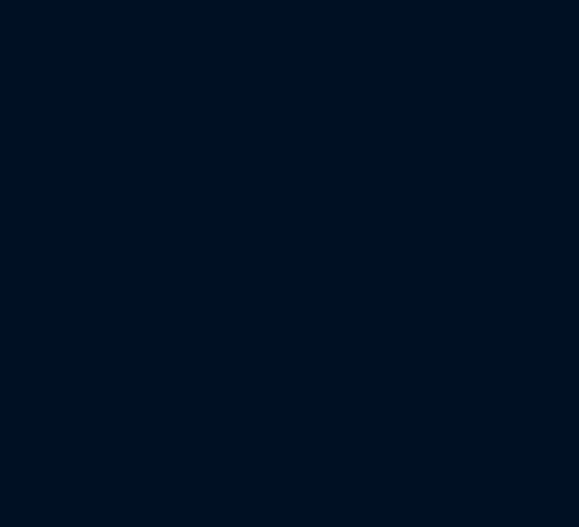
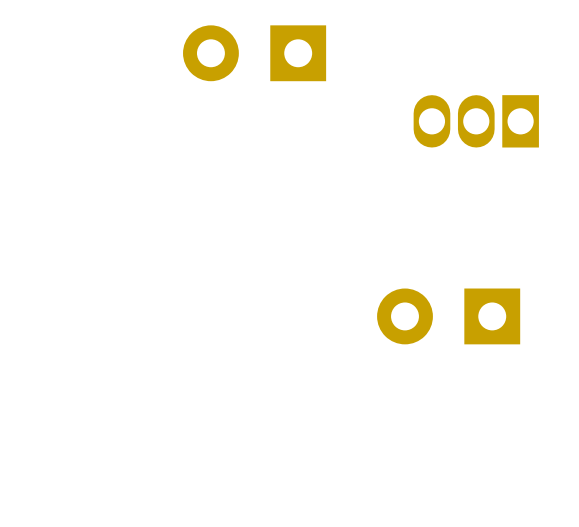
part: none -> (254, 53)
part: none -> (476, 121)
part: none -> (448, 316)

